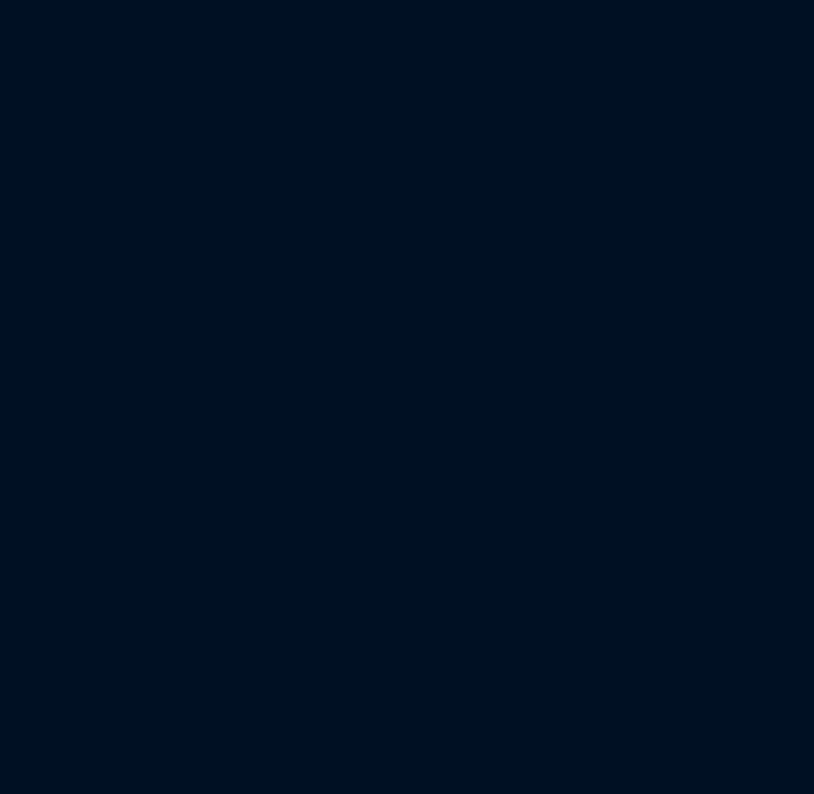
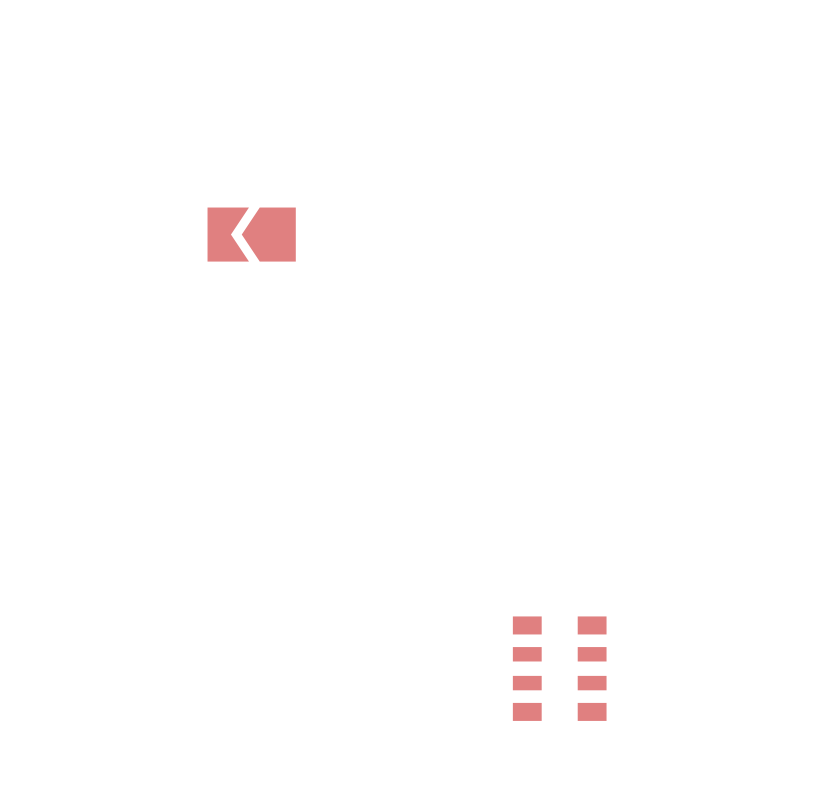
part: none -> (251, 234)
part: none -> (559, 668)

